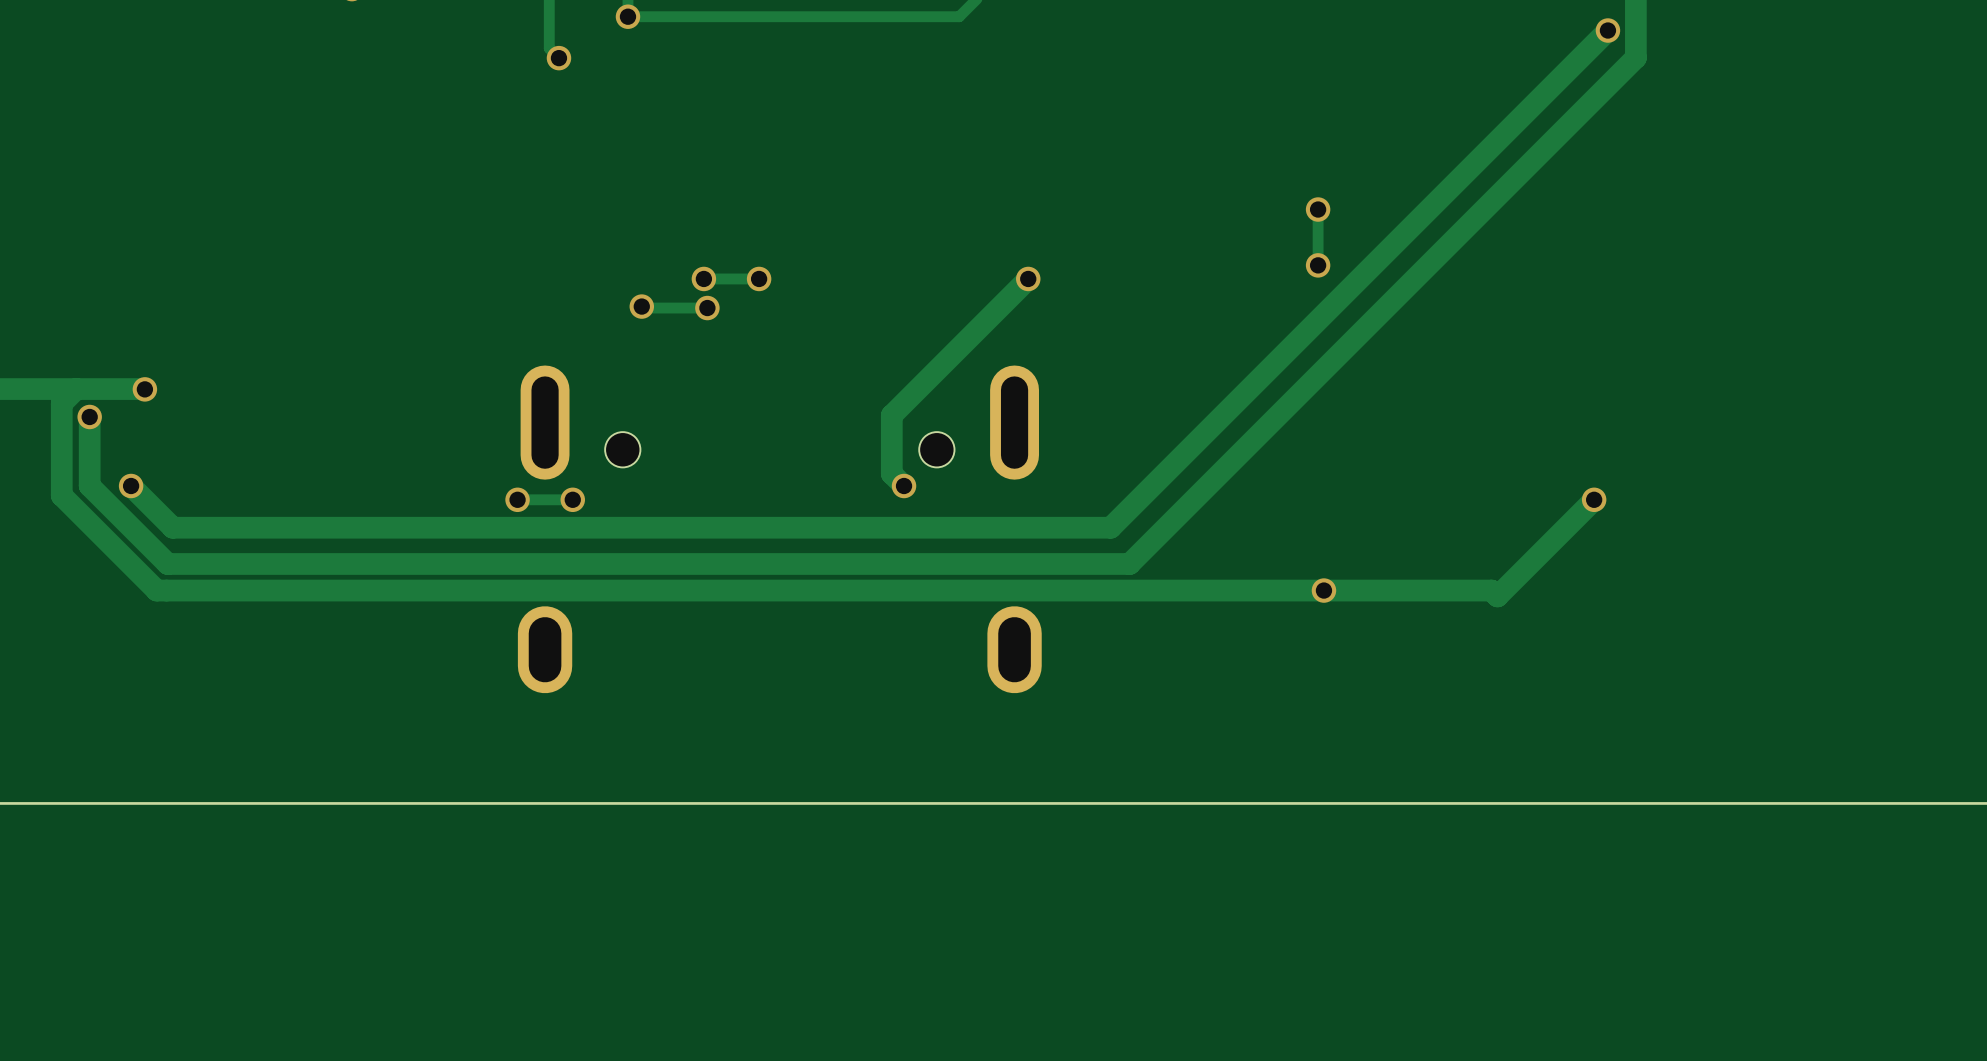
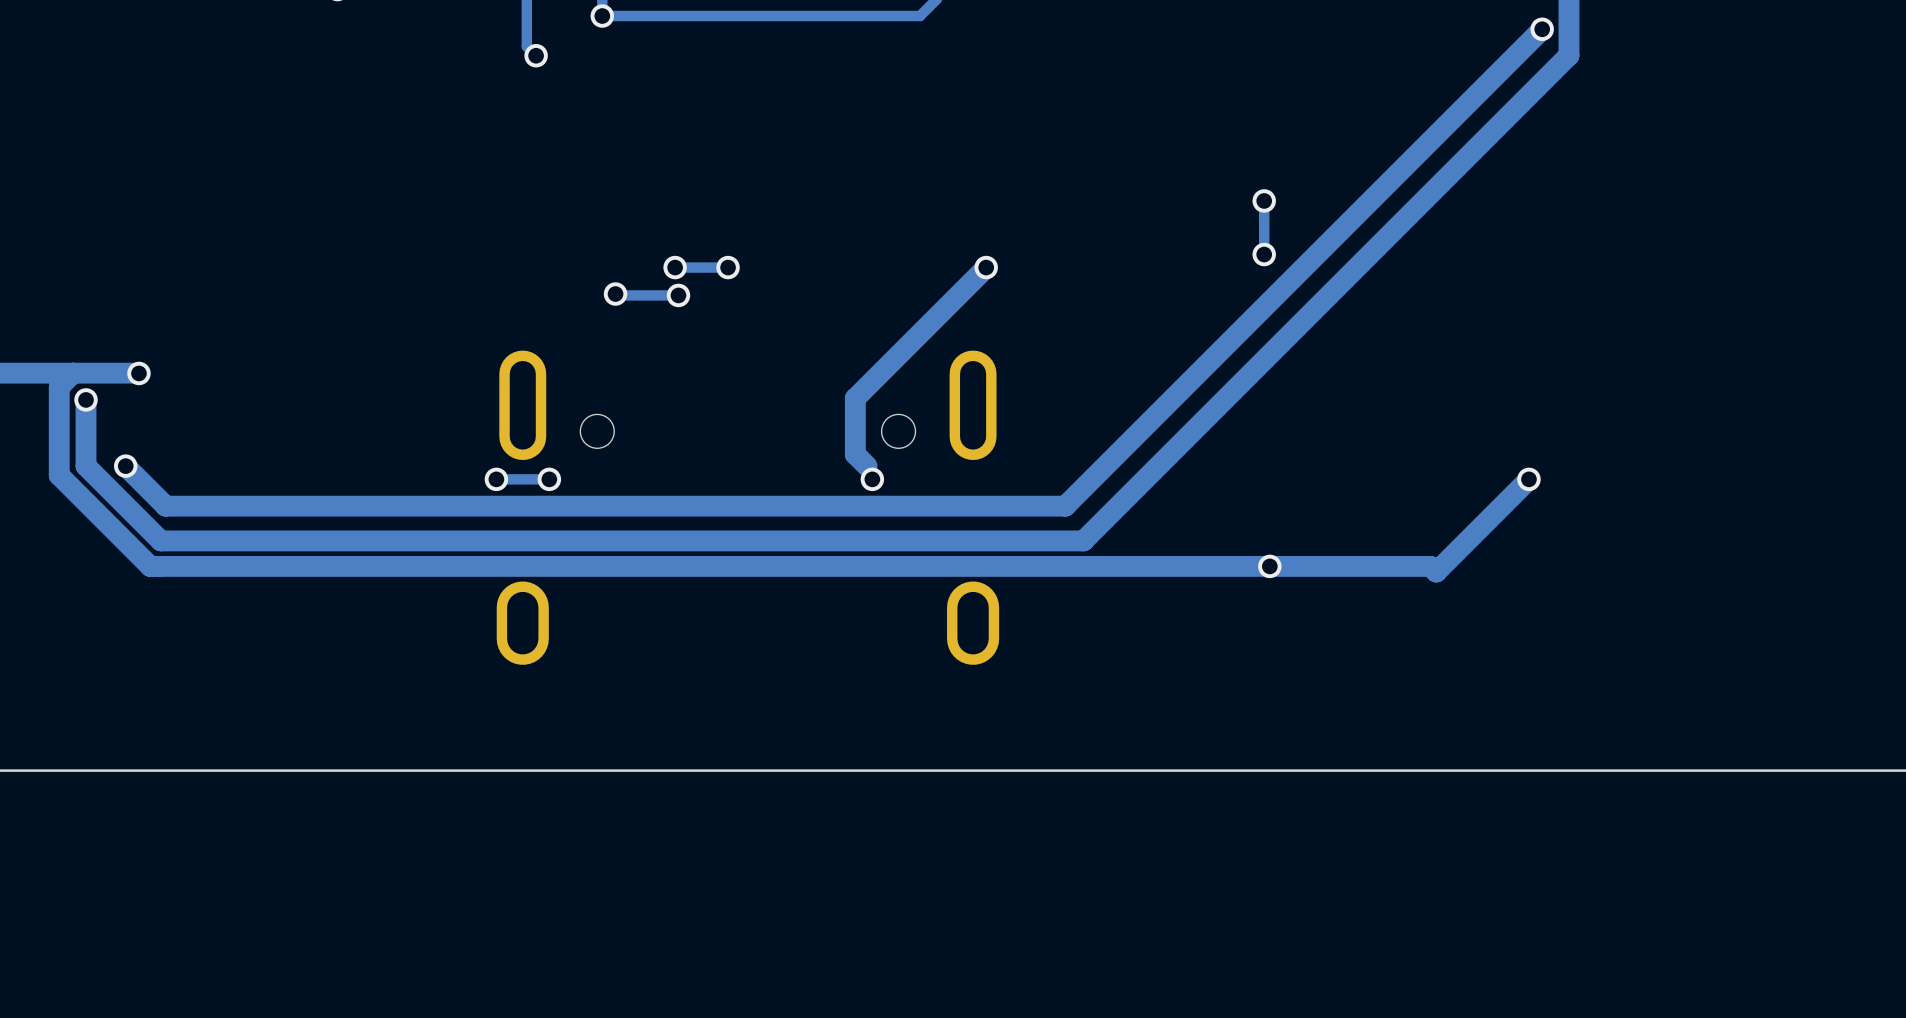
via position: (904, 486) -> (872, 479)

